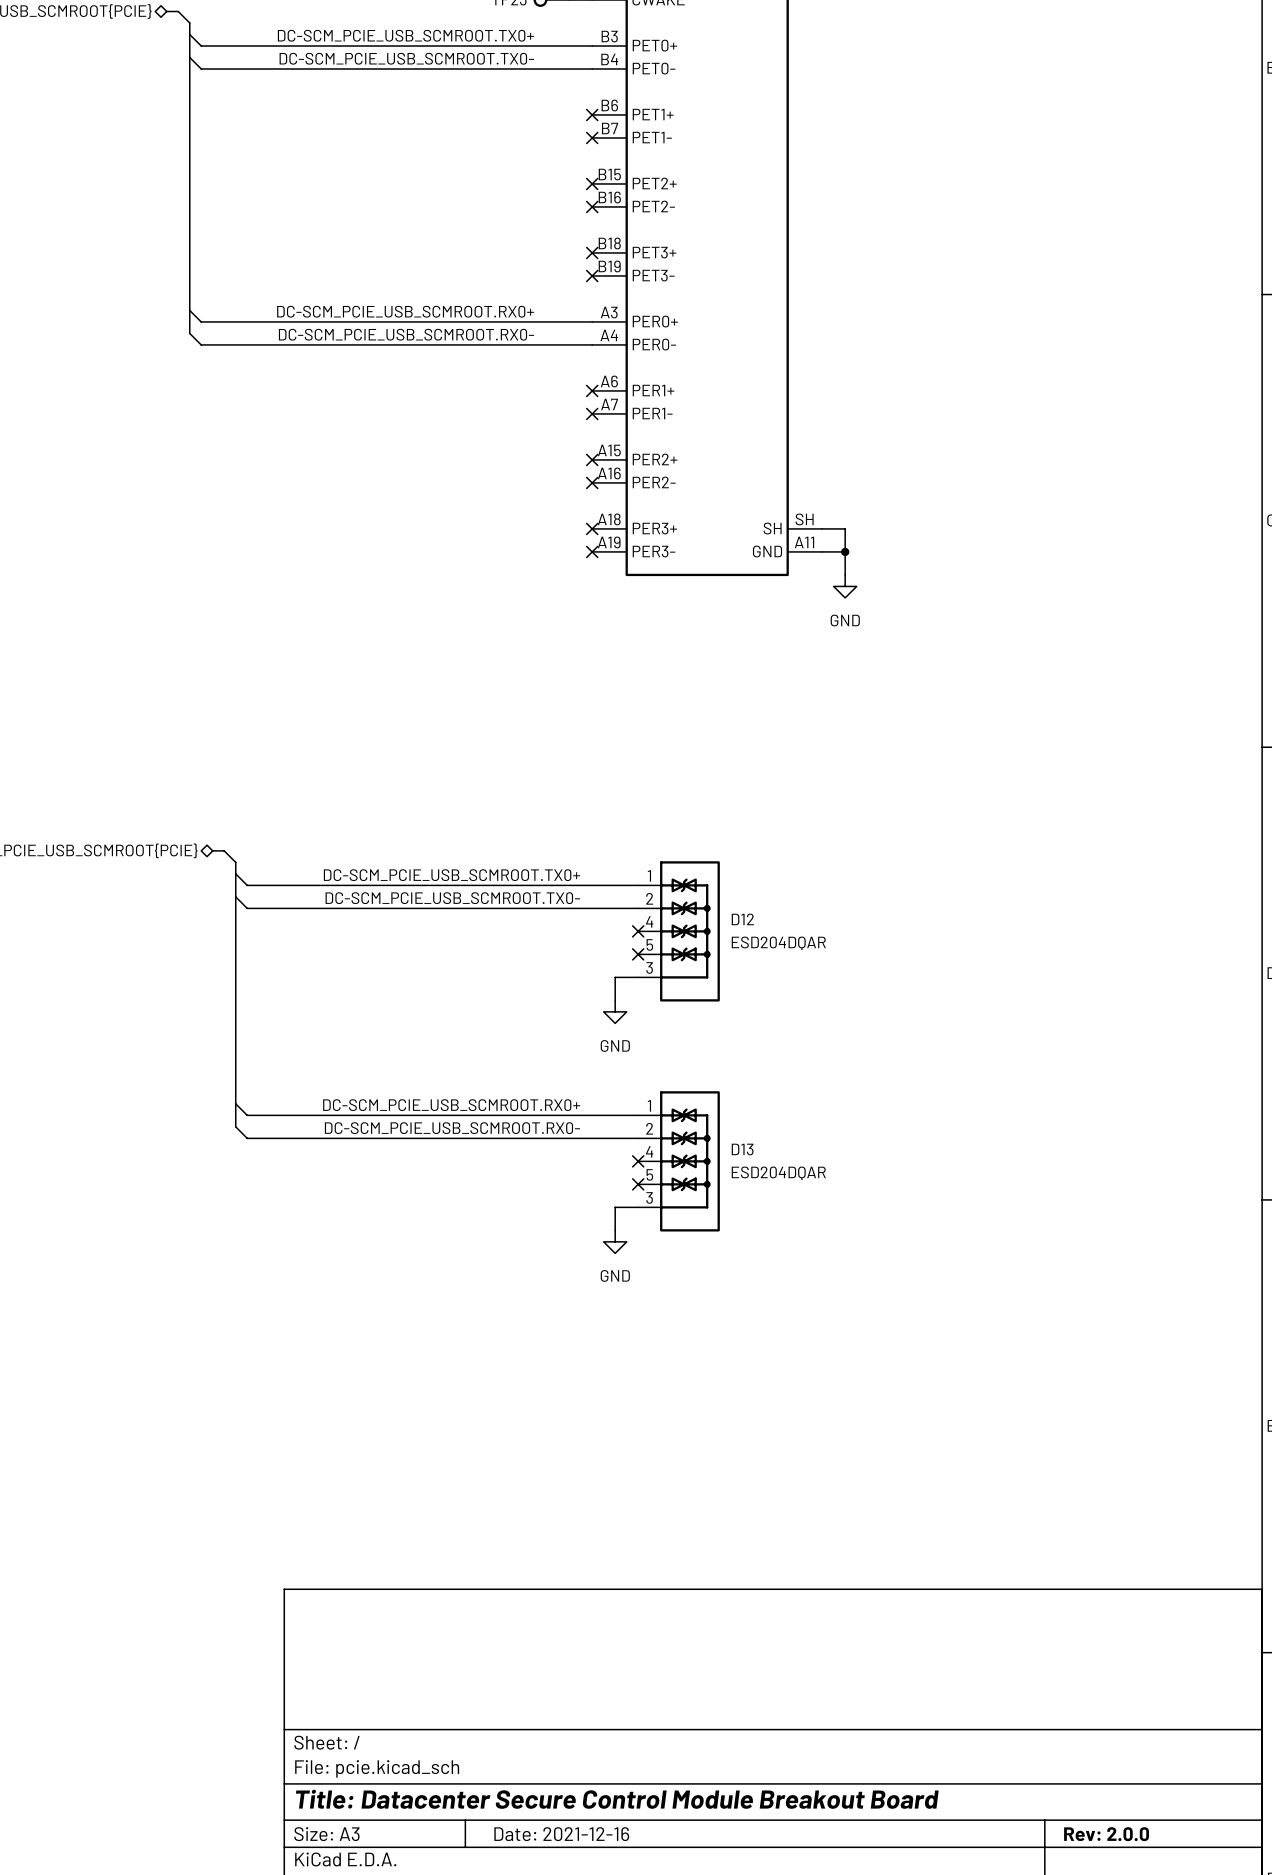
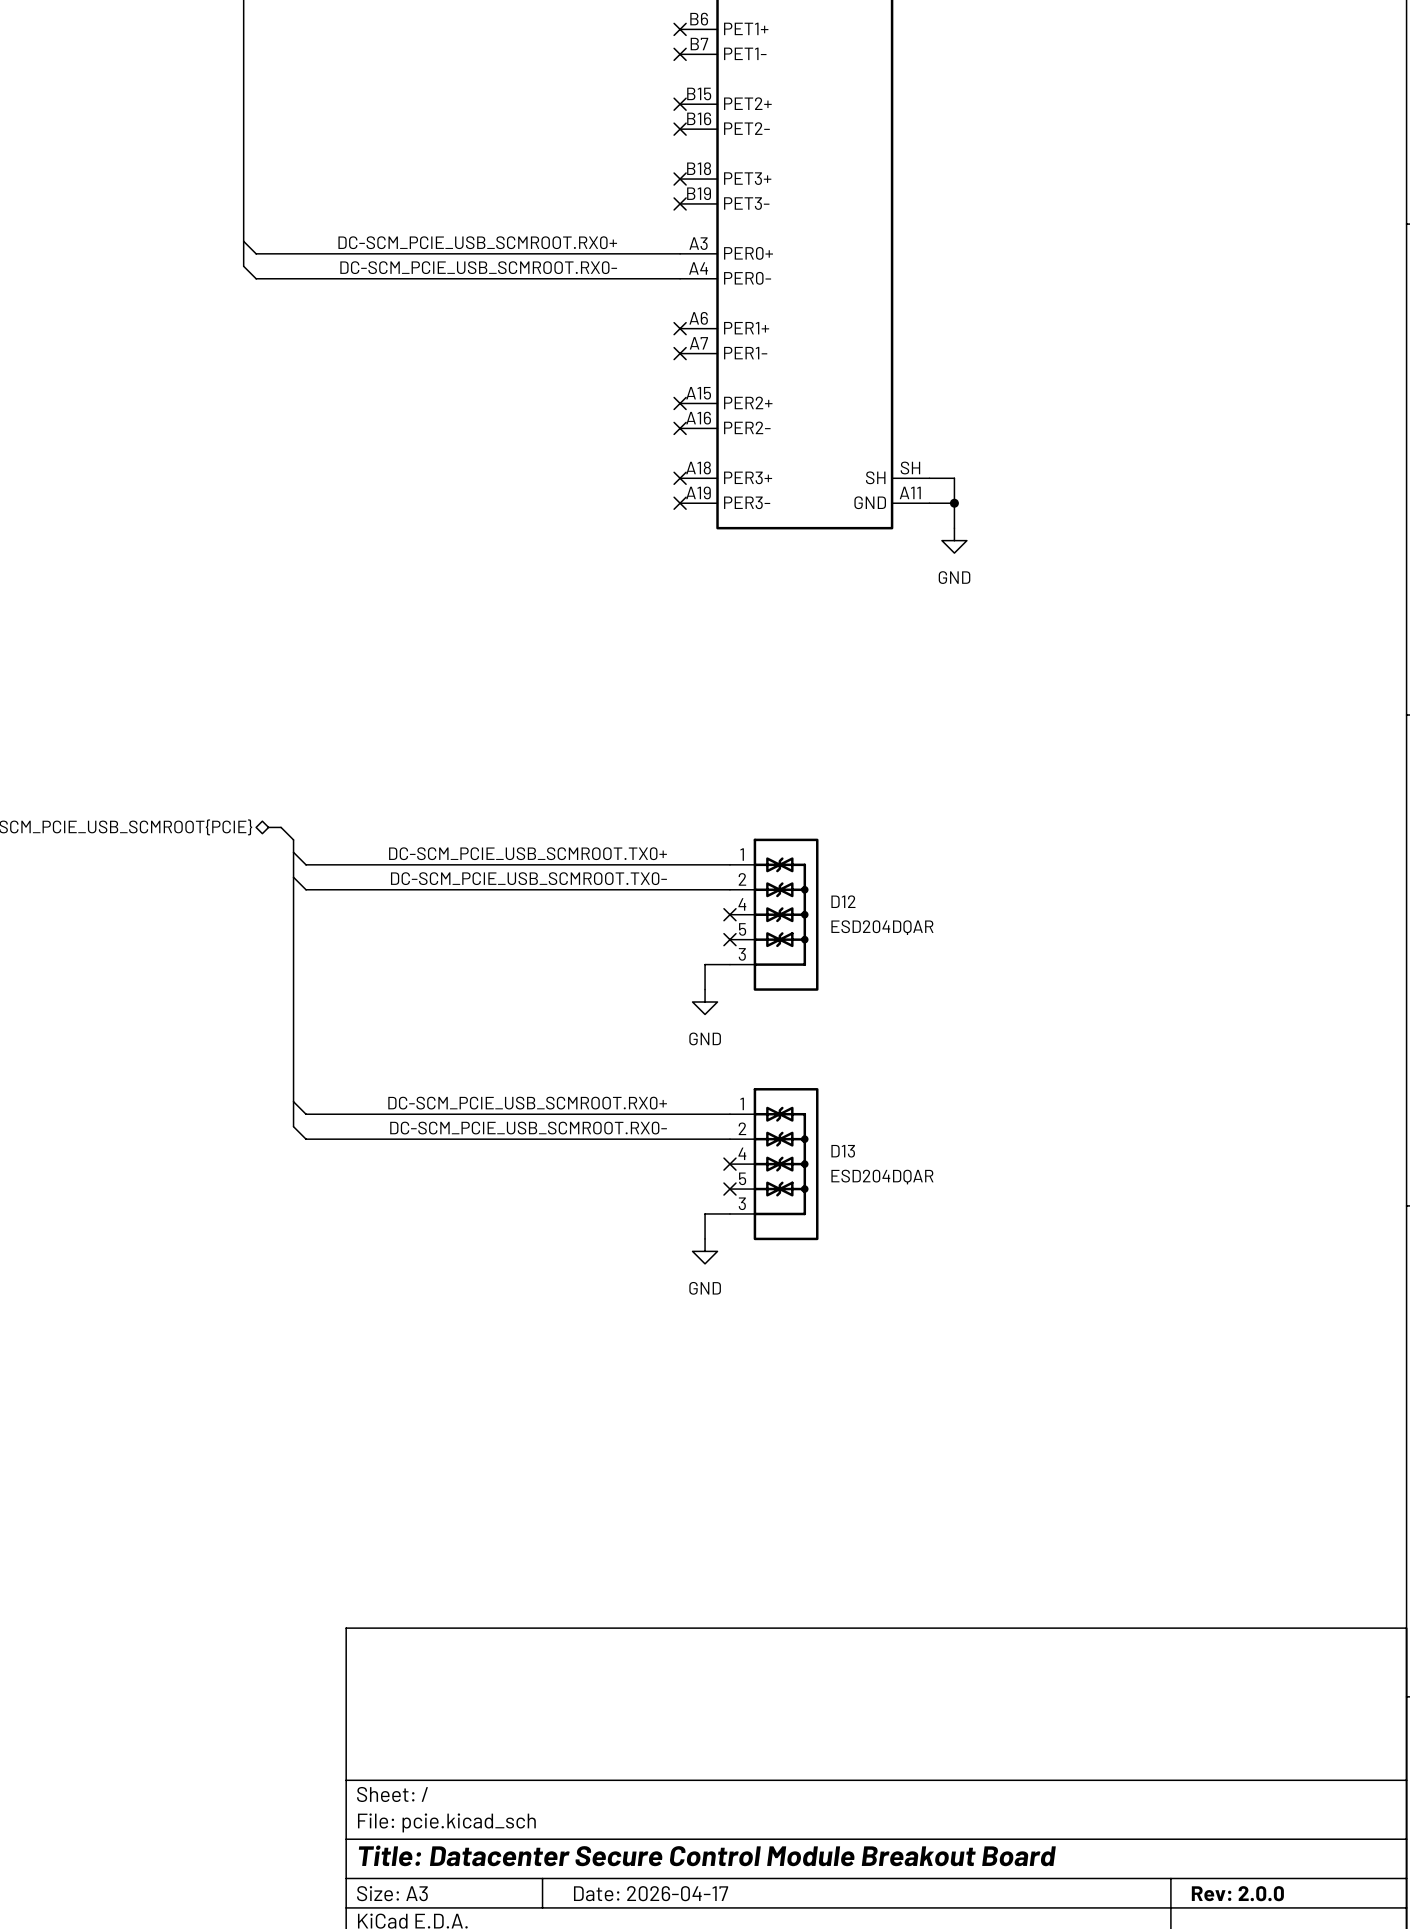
title block: Date: 2021-12-16 (561, 1834) -> Date: 2026-04-17 (651, 1893)

